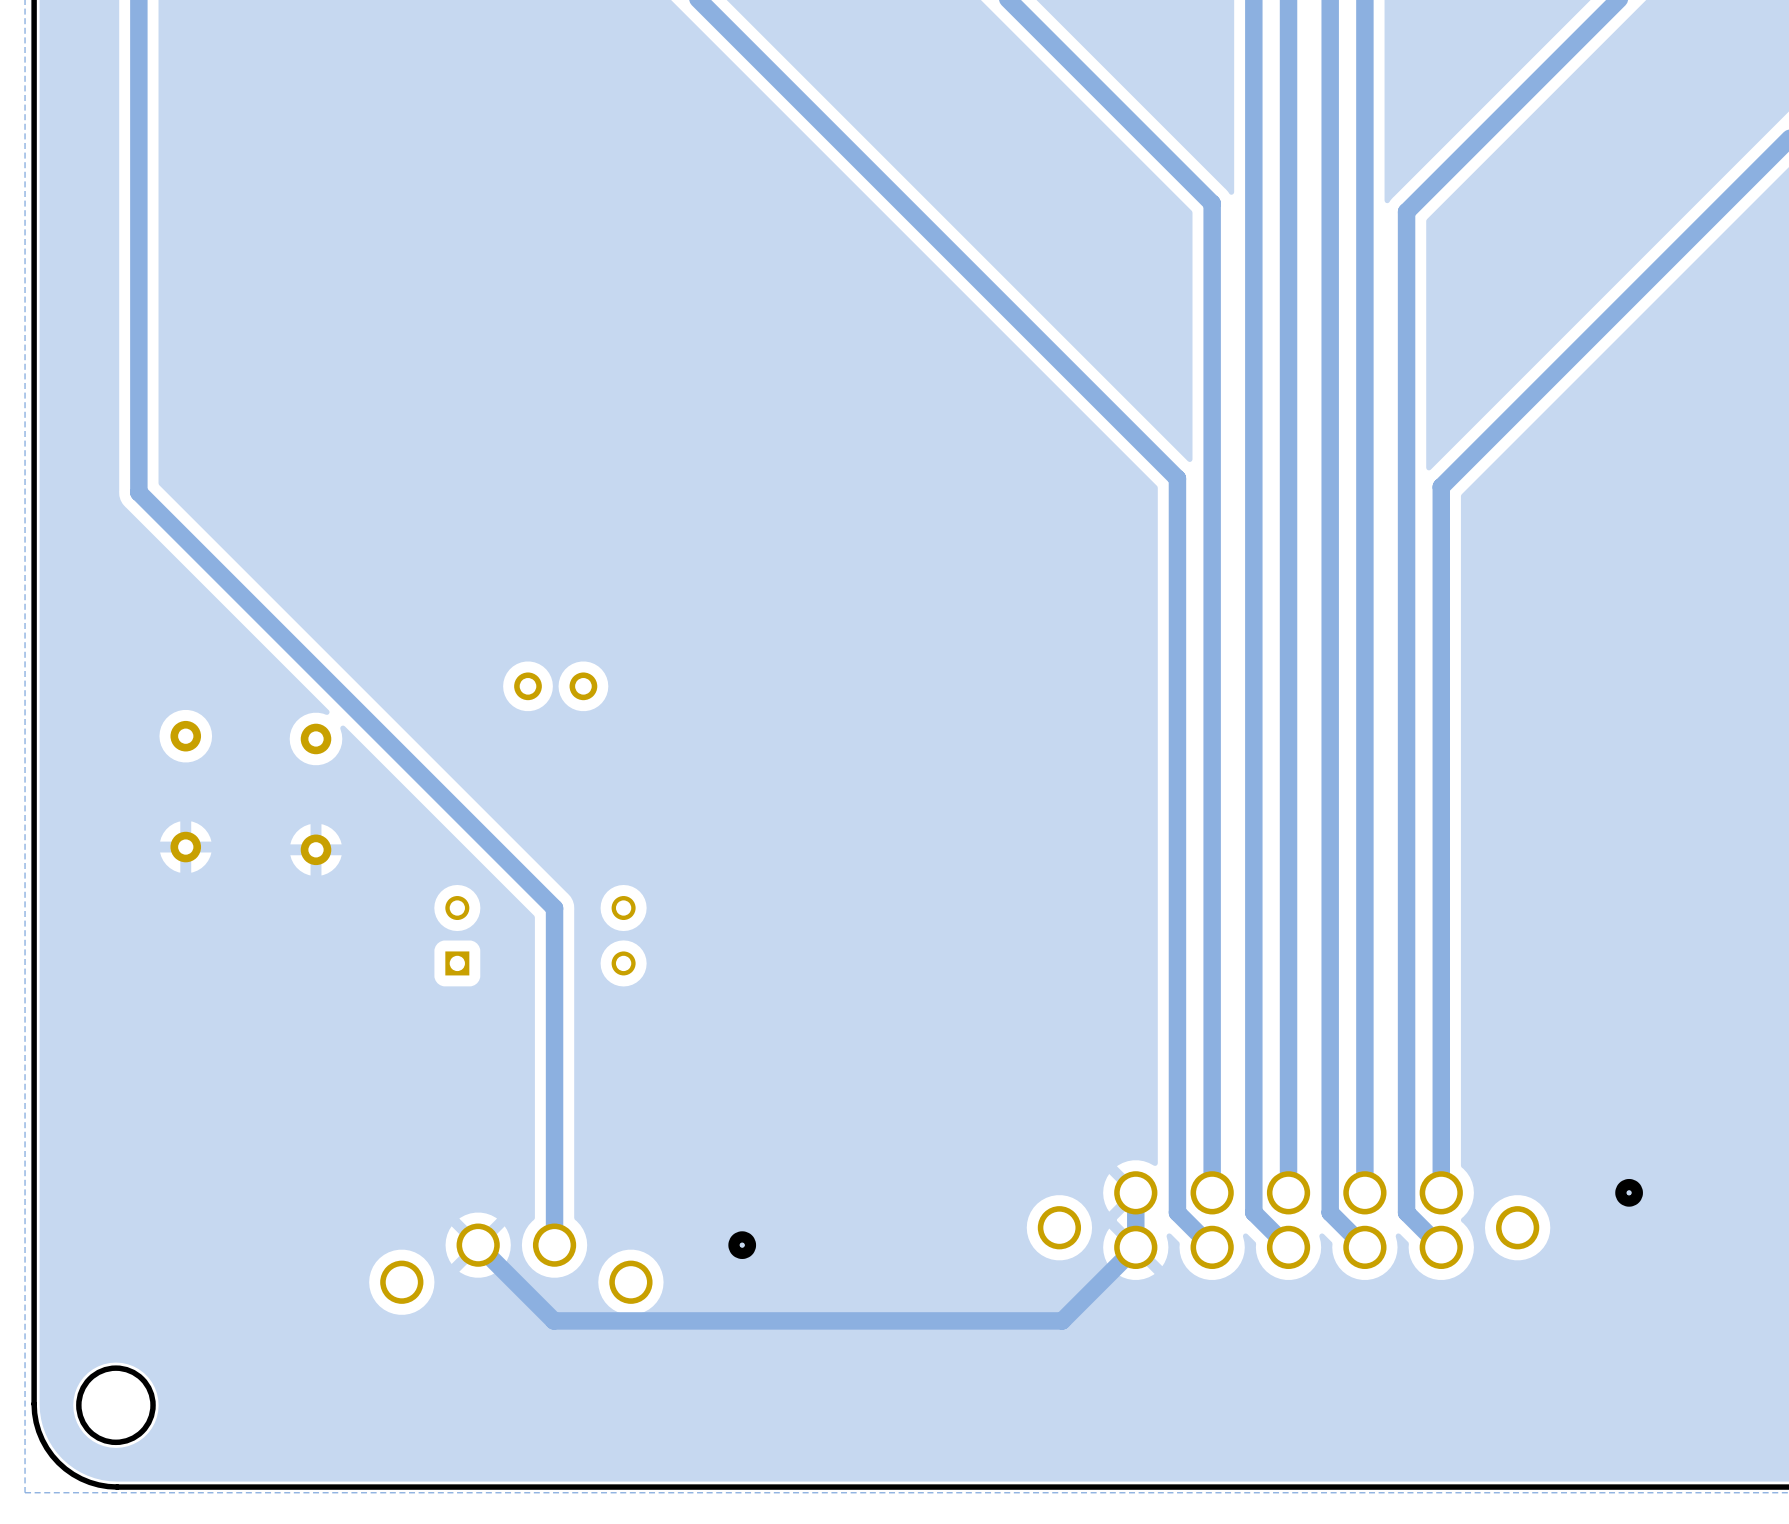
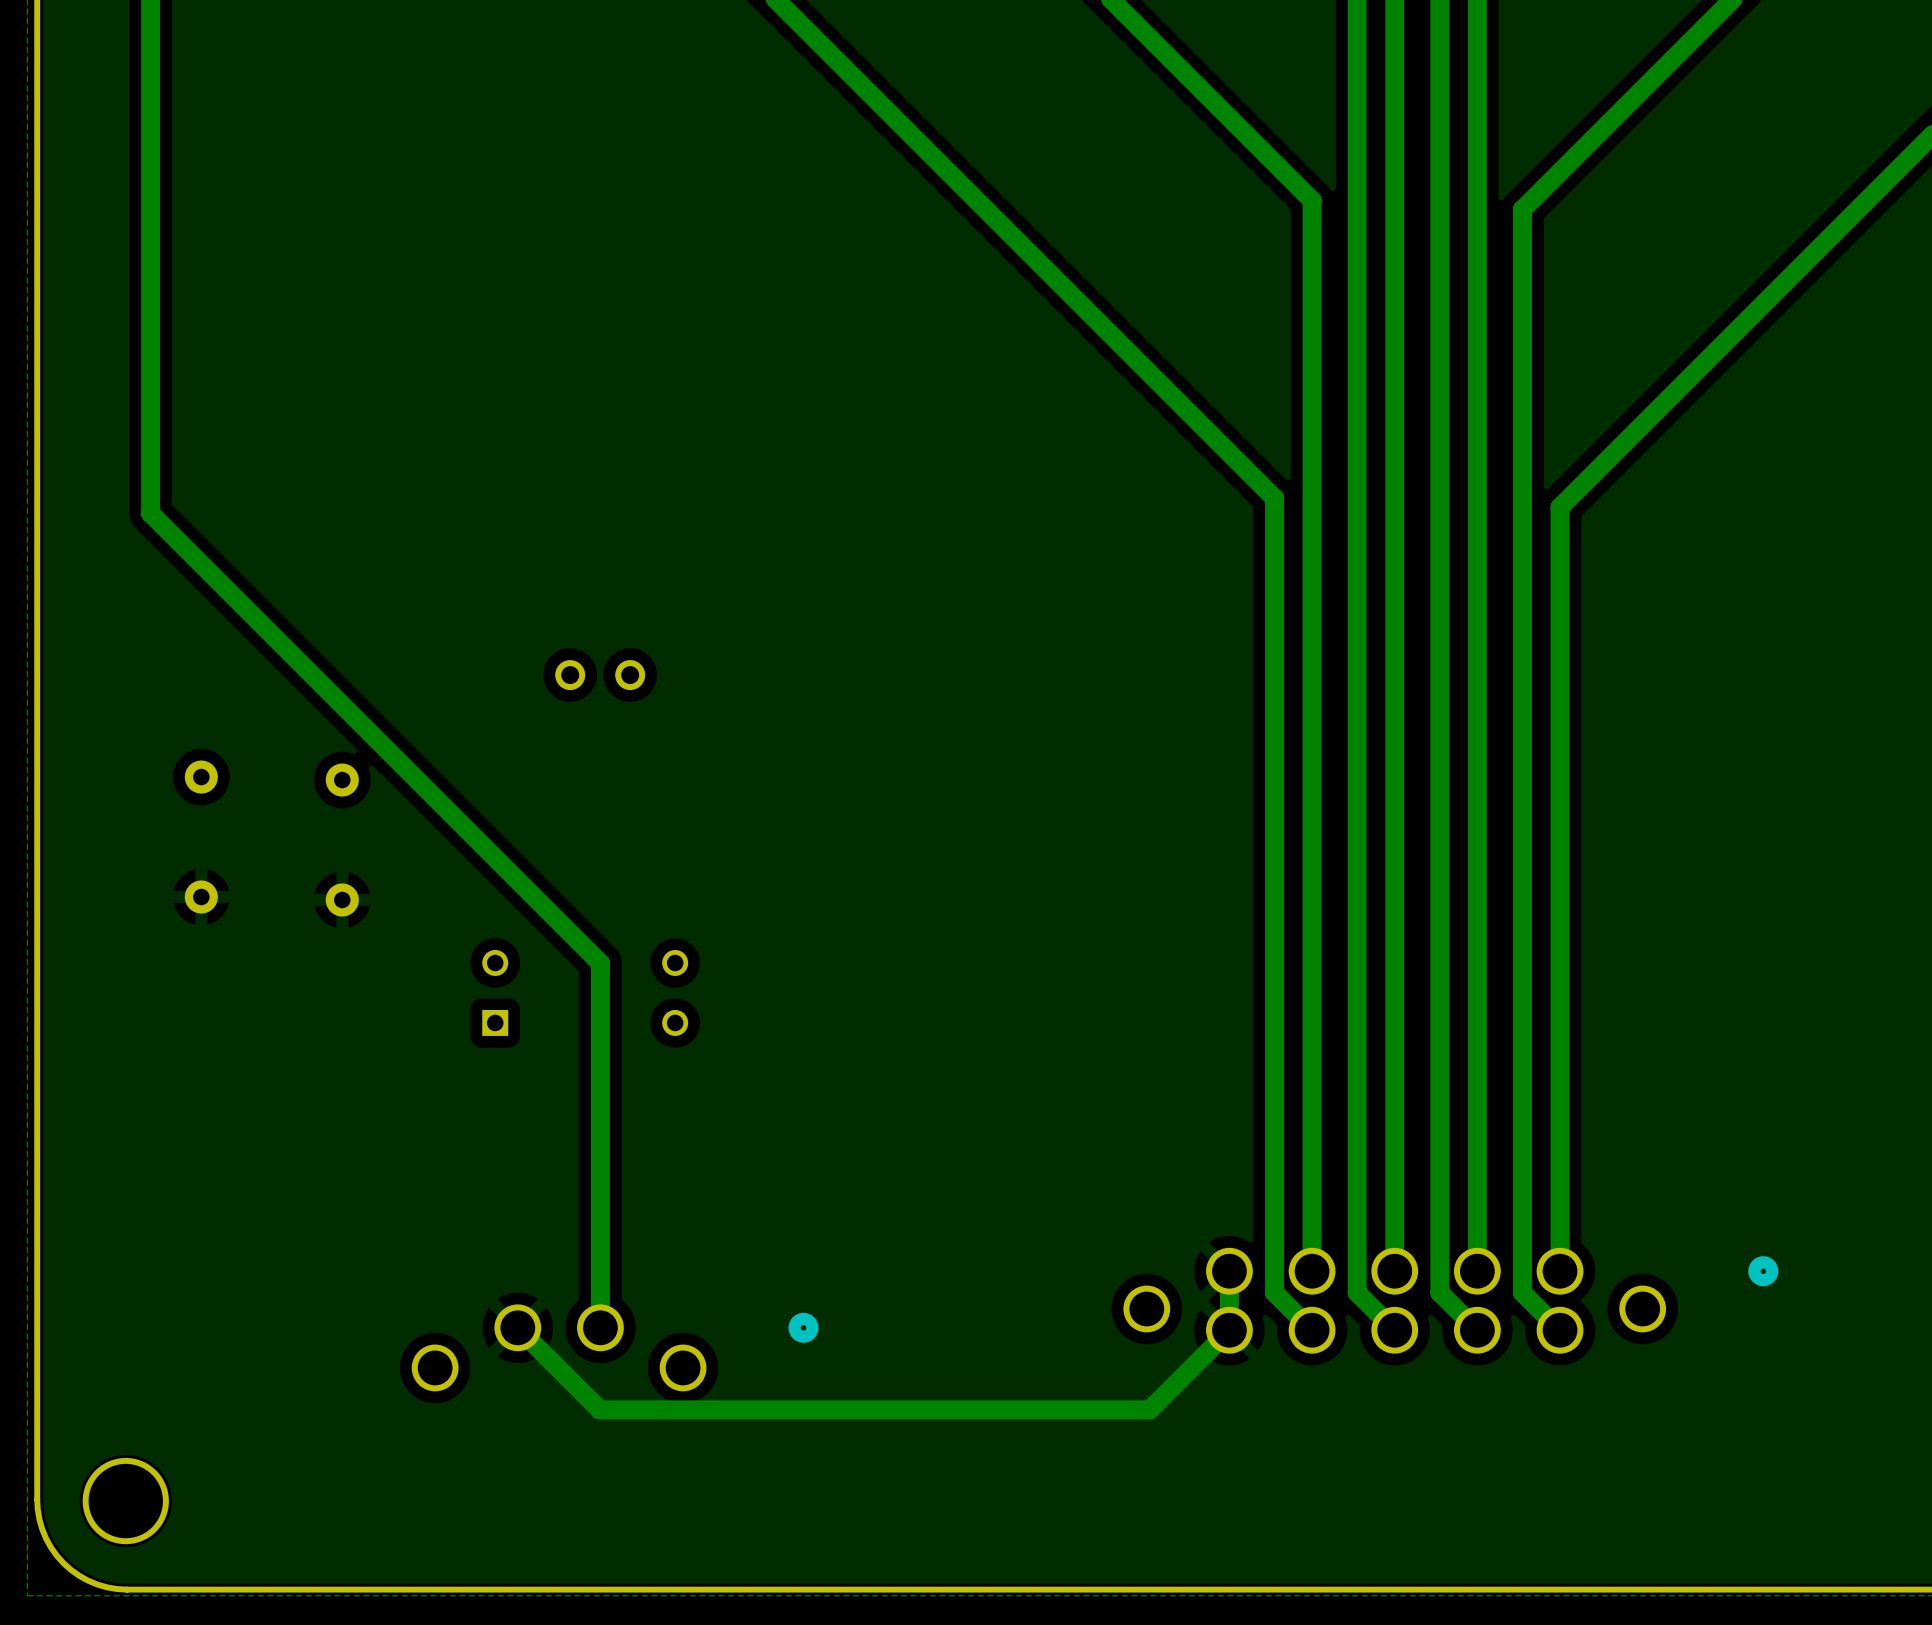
part position: (555, 686) -> (600, 675)

